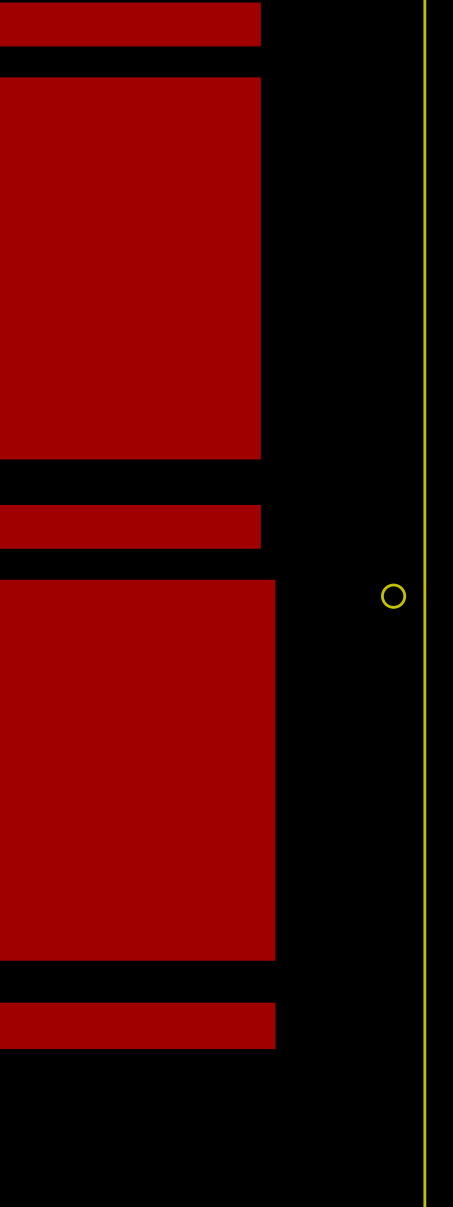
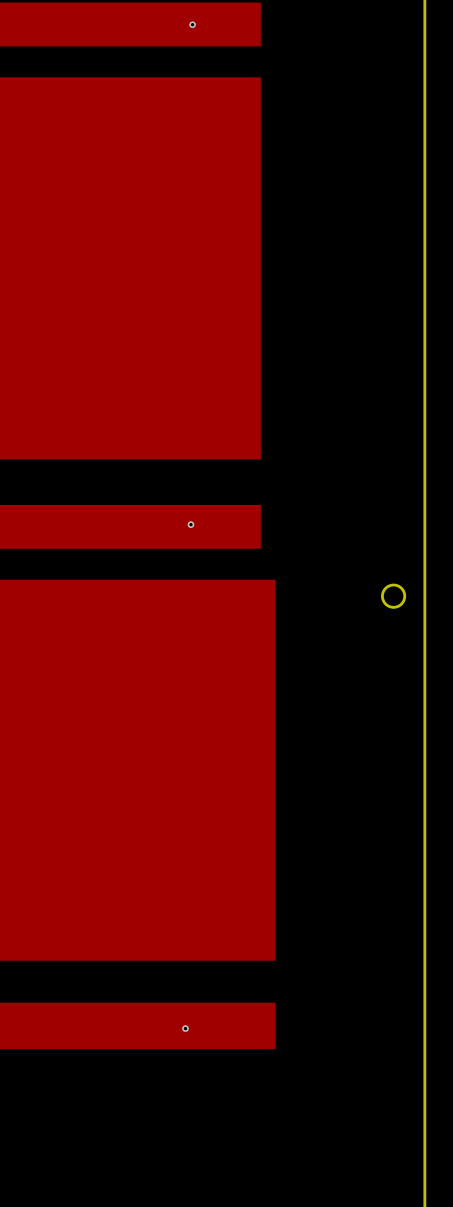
via: none -> (192, 24)
via: none -> (190, 524)
via: none -> (185, 1028)

